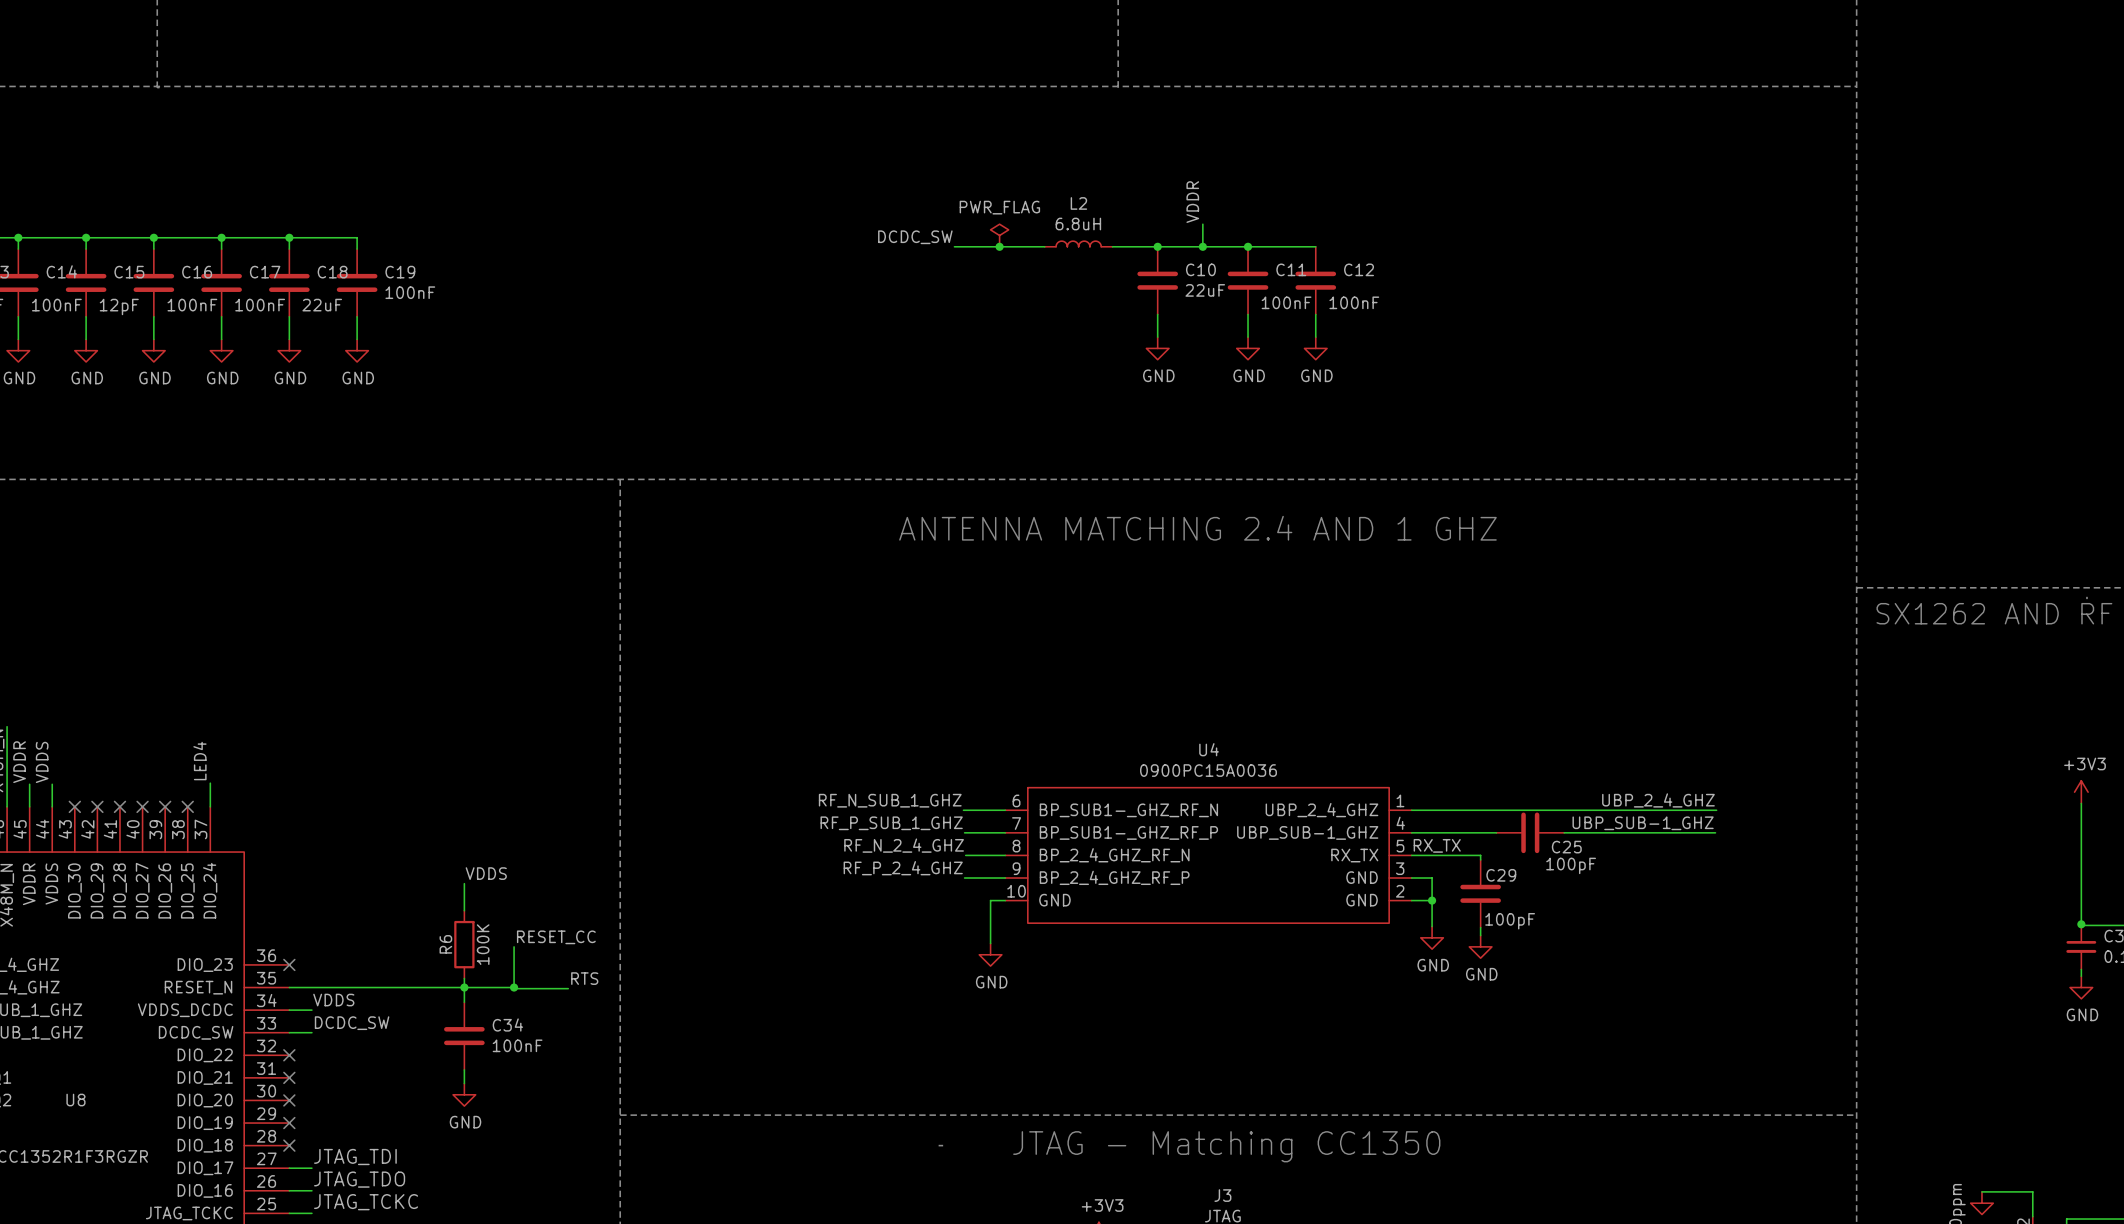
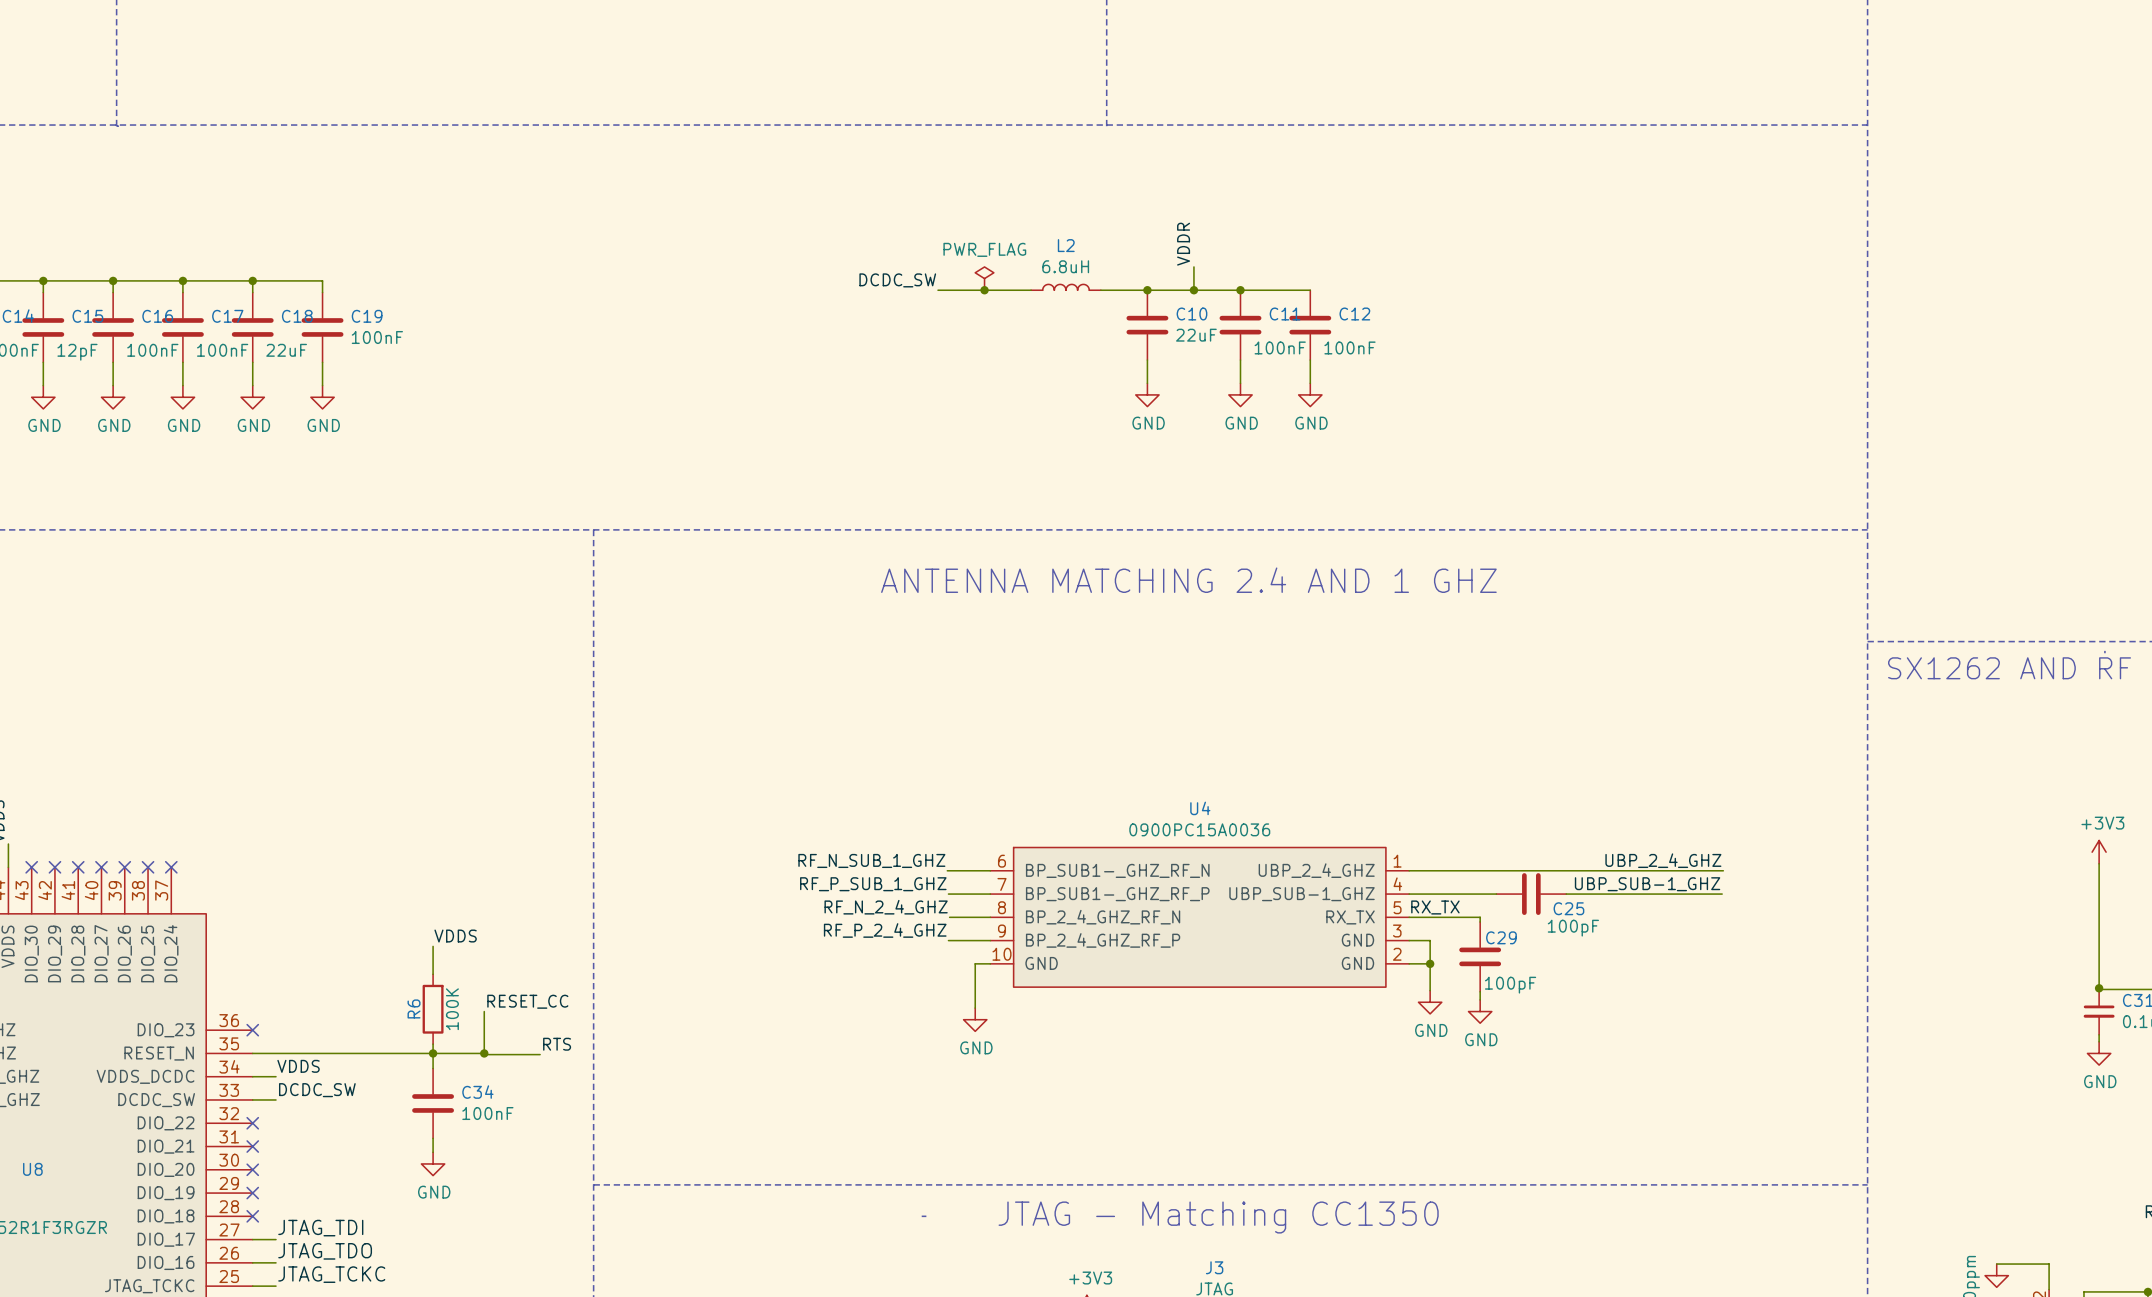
label: LED4 (199, 761) -> none
wire: (210, 783) (210, 806) -> none
no-connect mark: none -> (171, 867)

